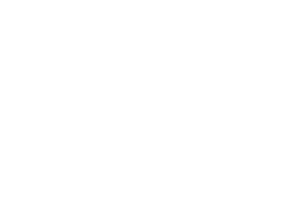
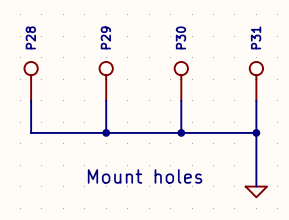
P28: none -> (31, 81)
P29: none -> (106, 81)
P30: none -> (181, 81)
P31: none -> (256, 81)
wire: none -> (31, 100) (31, 132) (256, 132)
wire: none -> (106, 100) (106, 132)
wire: none -> (181, 100) (181, 132)
wire: none -> (256, 100) (256, 186)
junction: none -> (106, 132)
junction: none -> (181, 132)
junction: none -> (256, 132)
text: none -> Mount holes (145, 176)
power symbol: none -> (256, 191)

